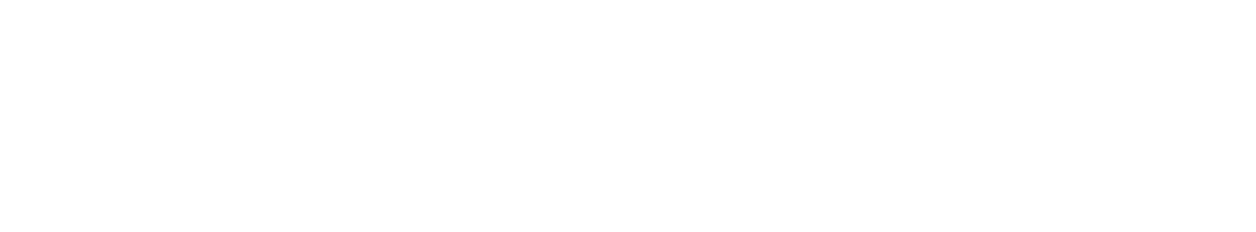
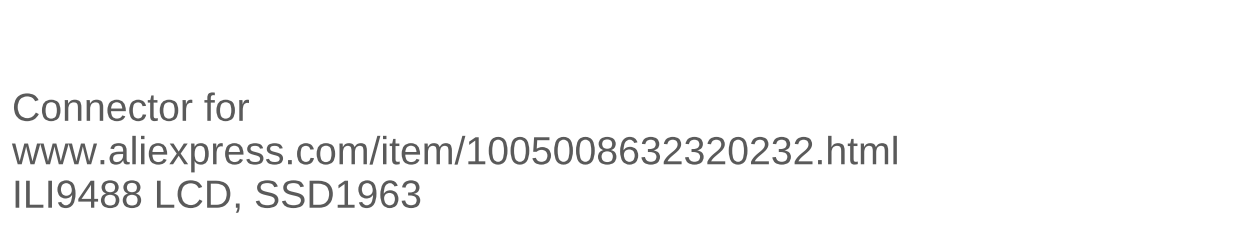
text: none -> Connector for (131, 106)
text: none -> www.aliexpress.com/item/1005008632320232.html (454, 154)
text: none -> ILI9488 LCD, SSD1963 (217, 196)

